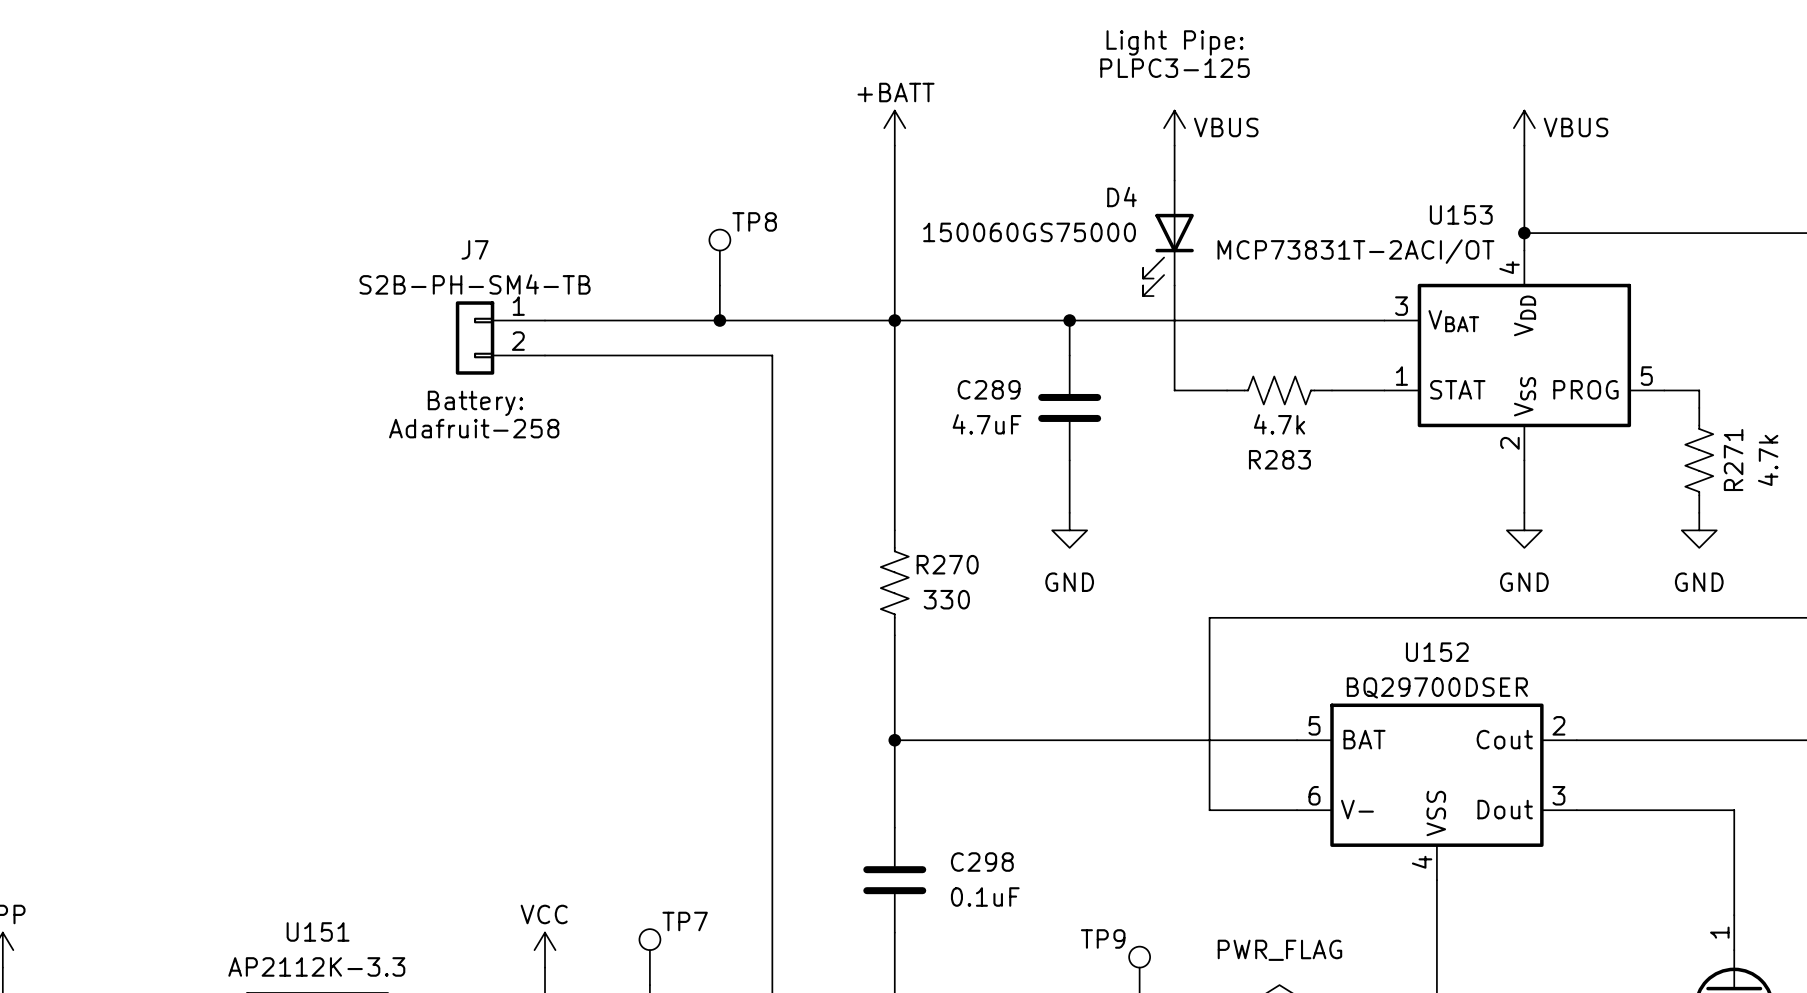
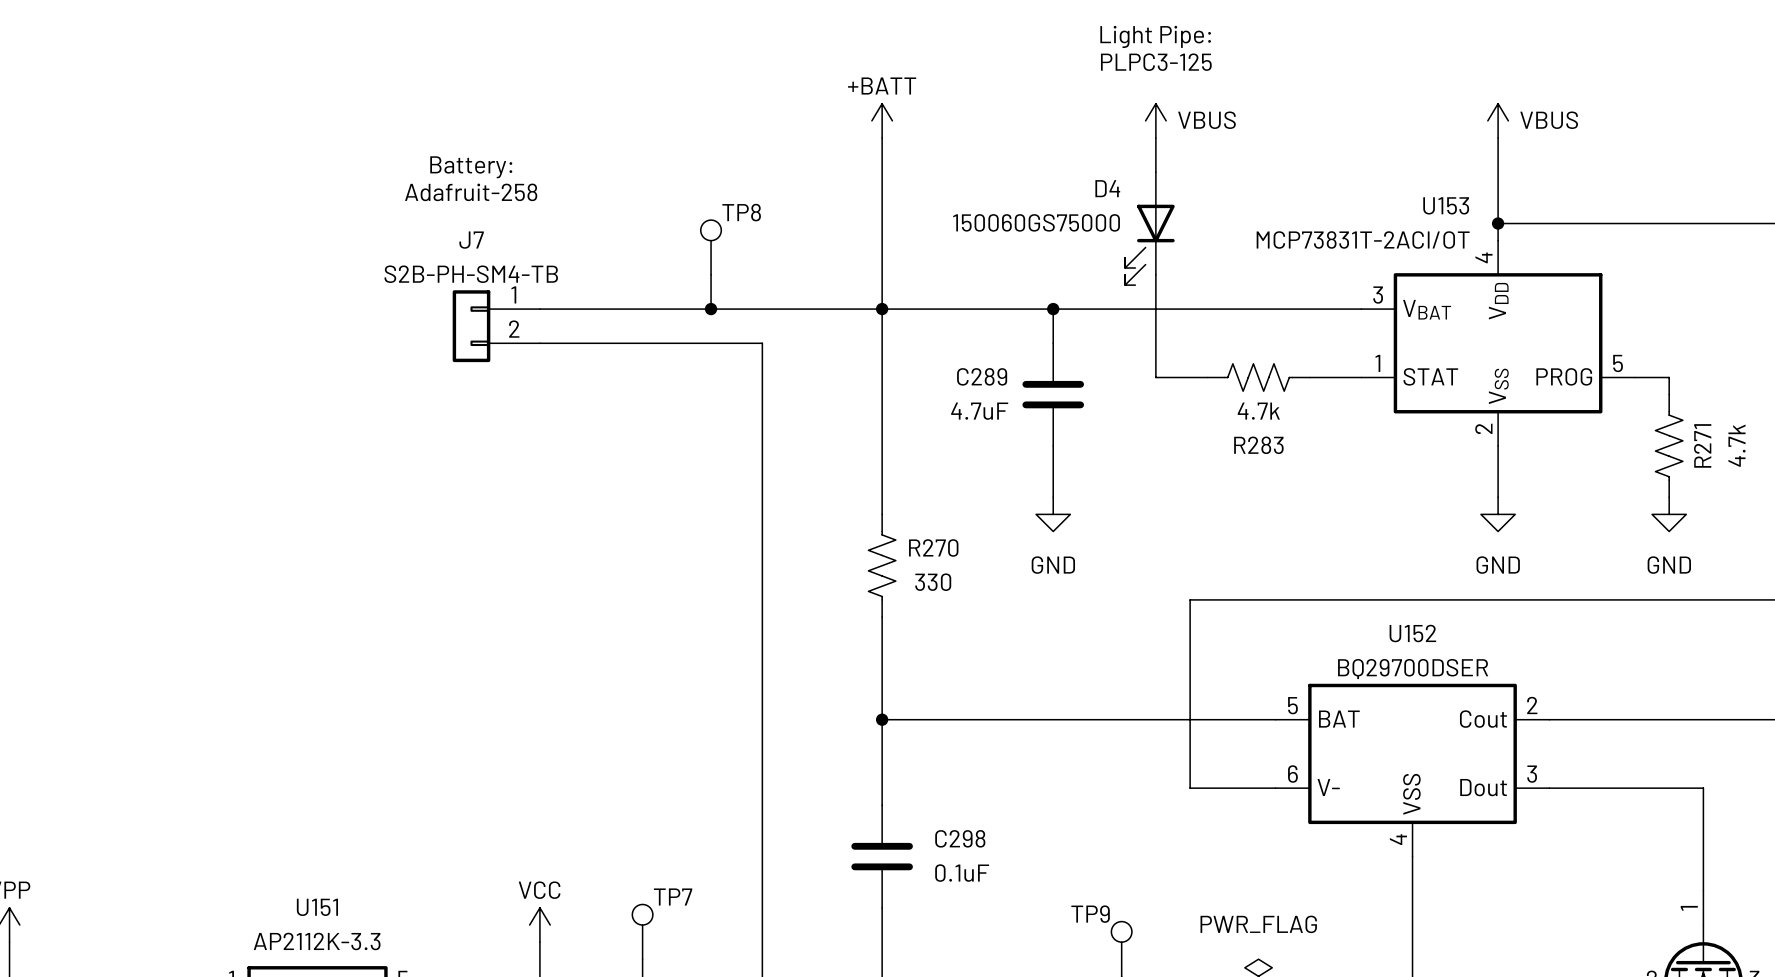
text position: Battery: (475, 403) -> Battery: (471, 167)
text position: Adafruit-258 (474, 428) -> Adafruit-258 (471, 192)

